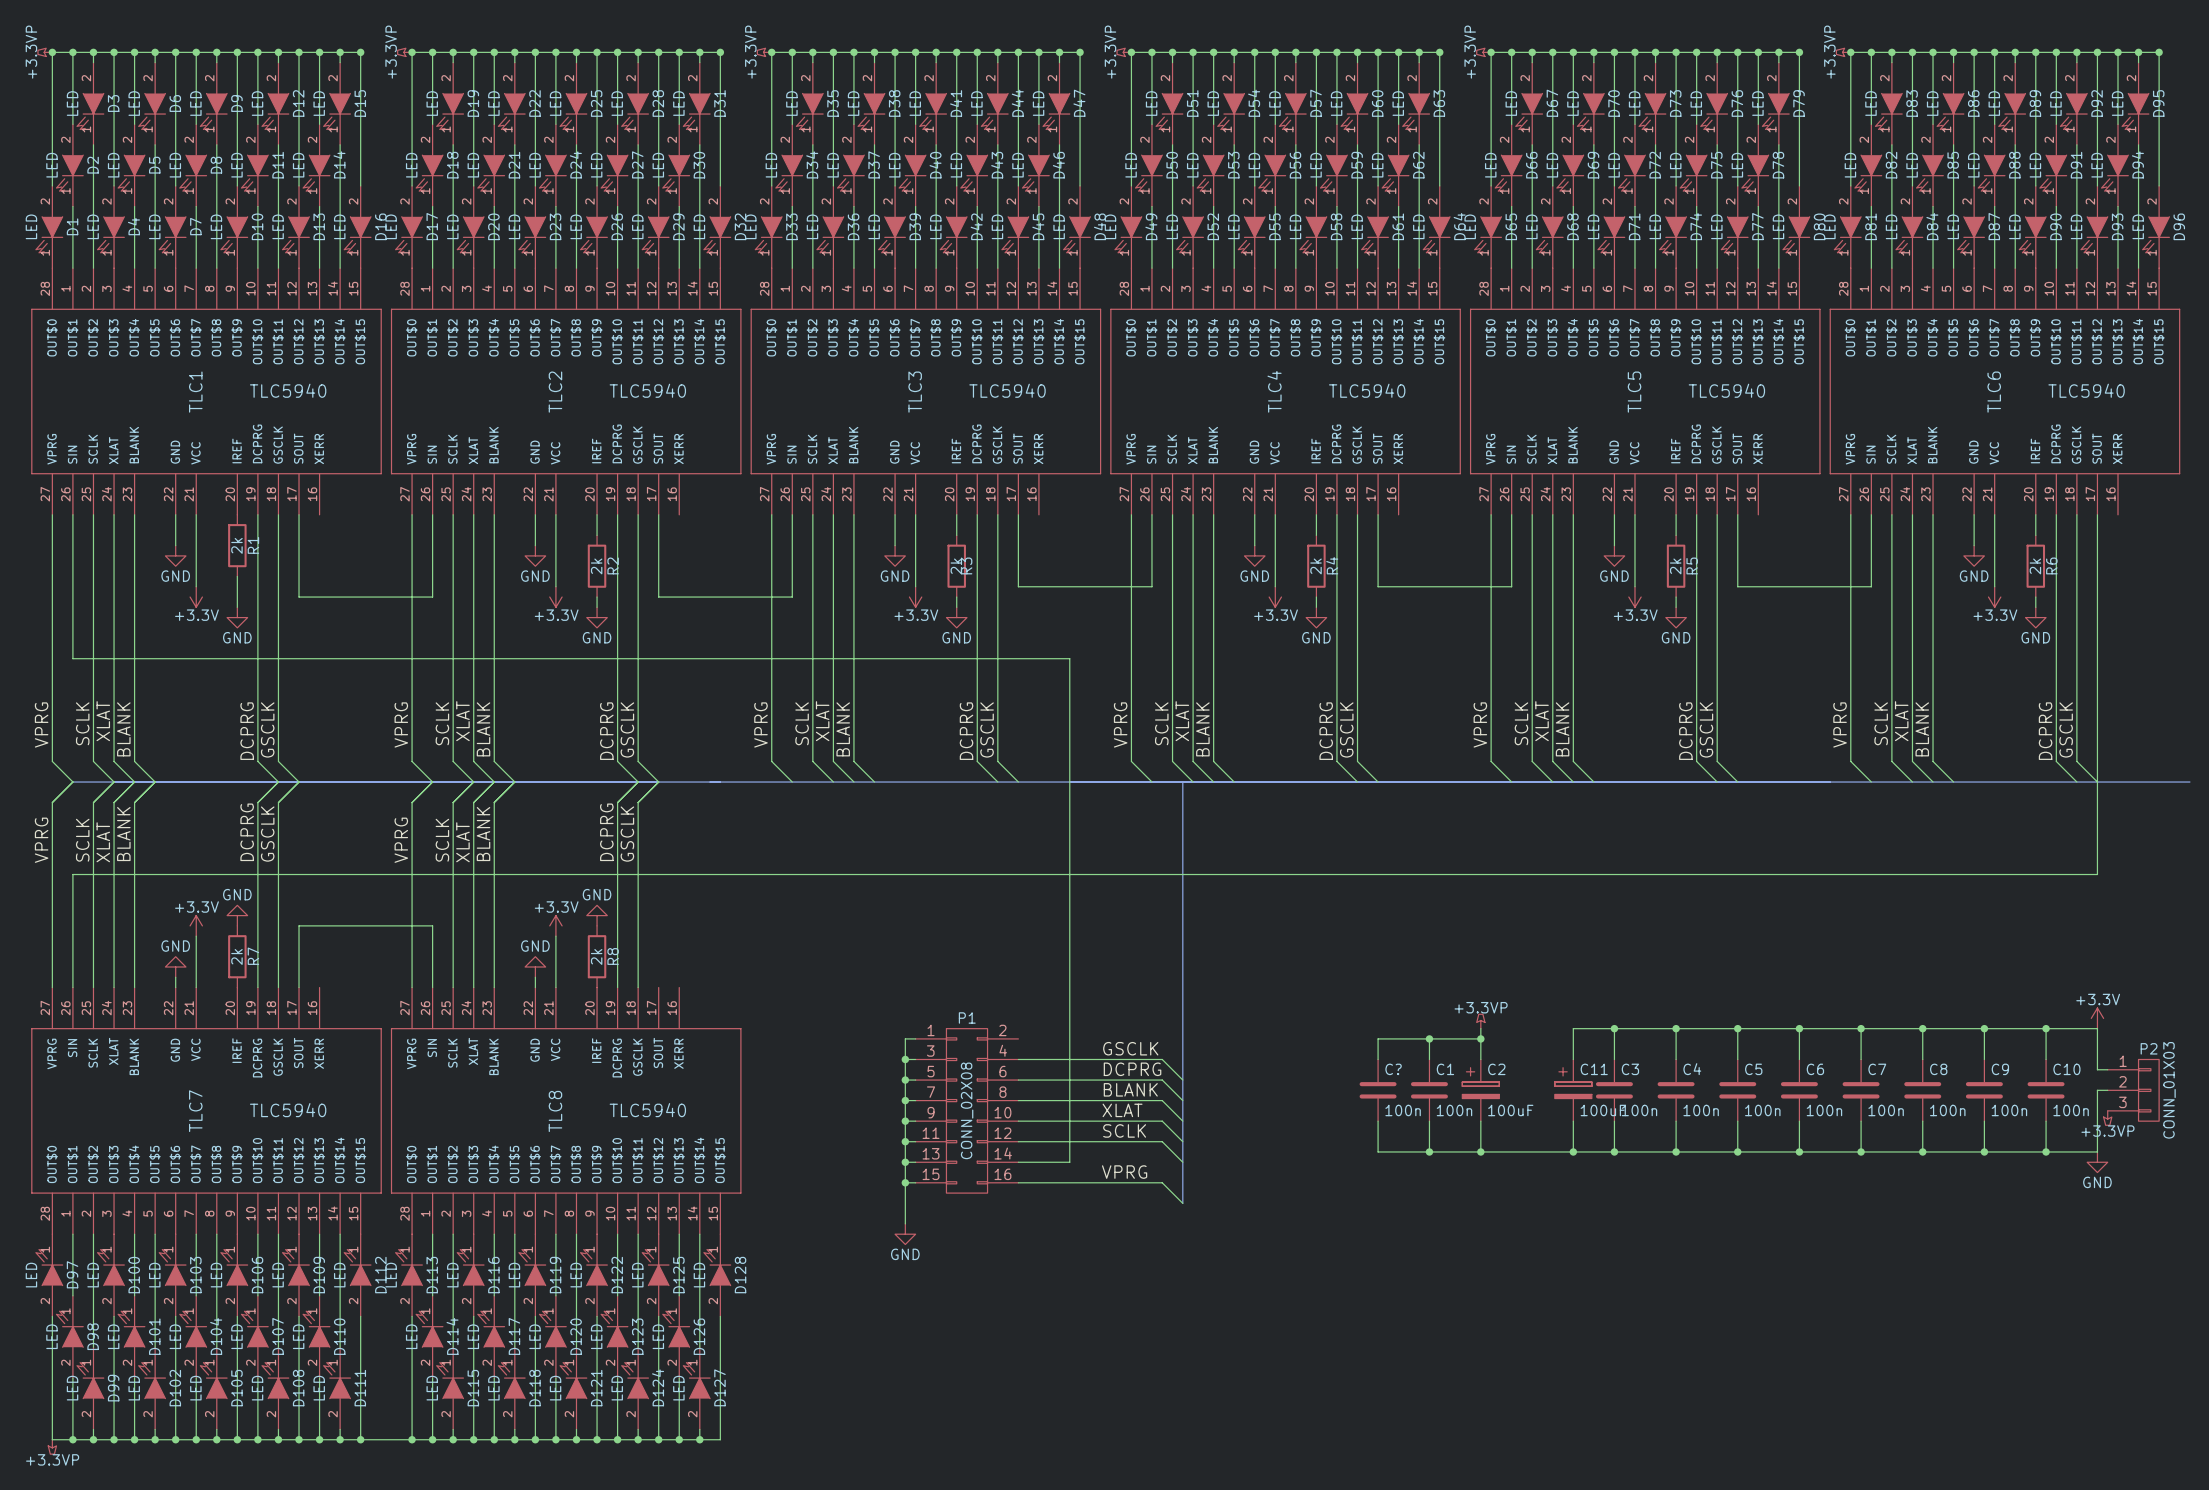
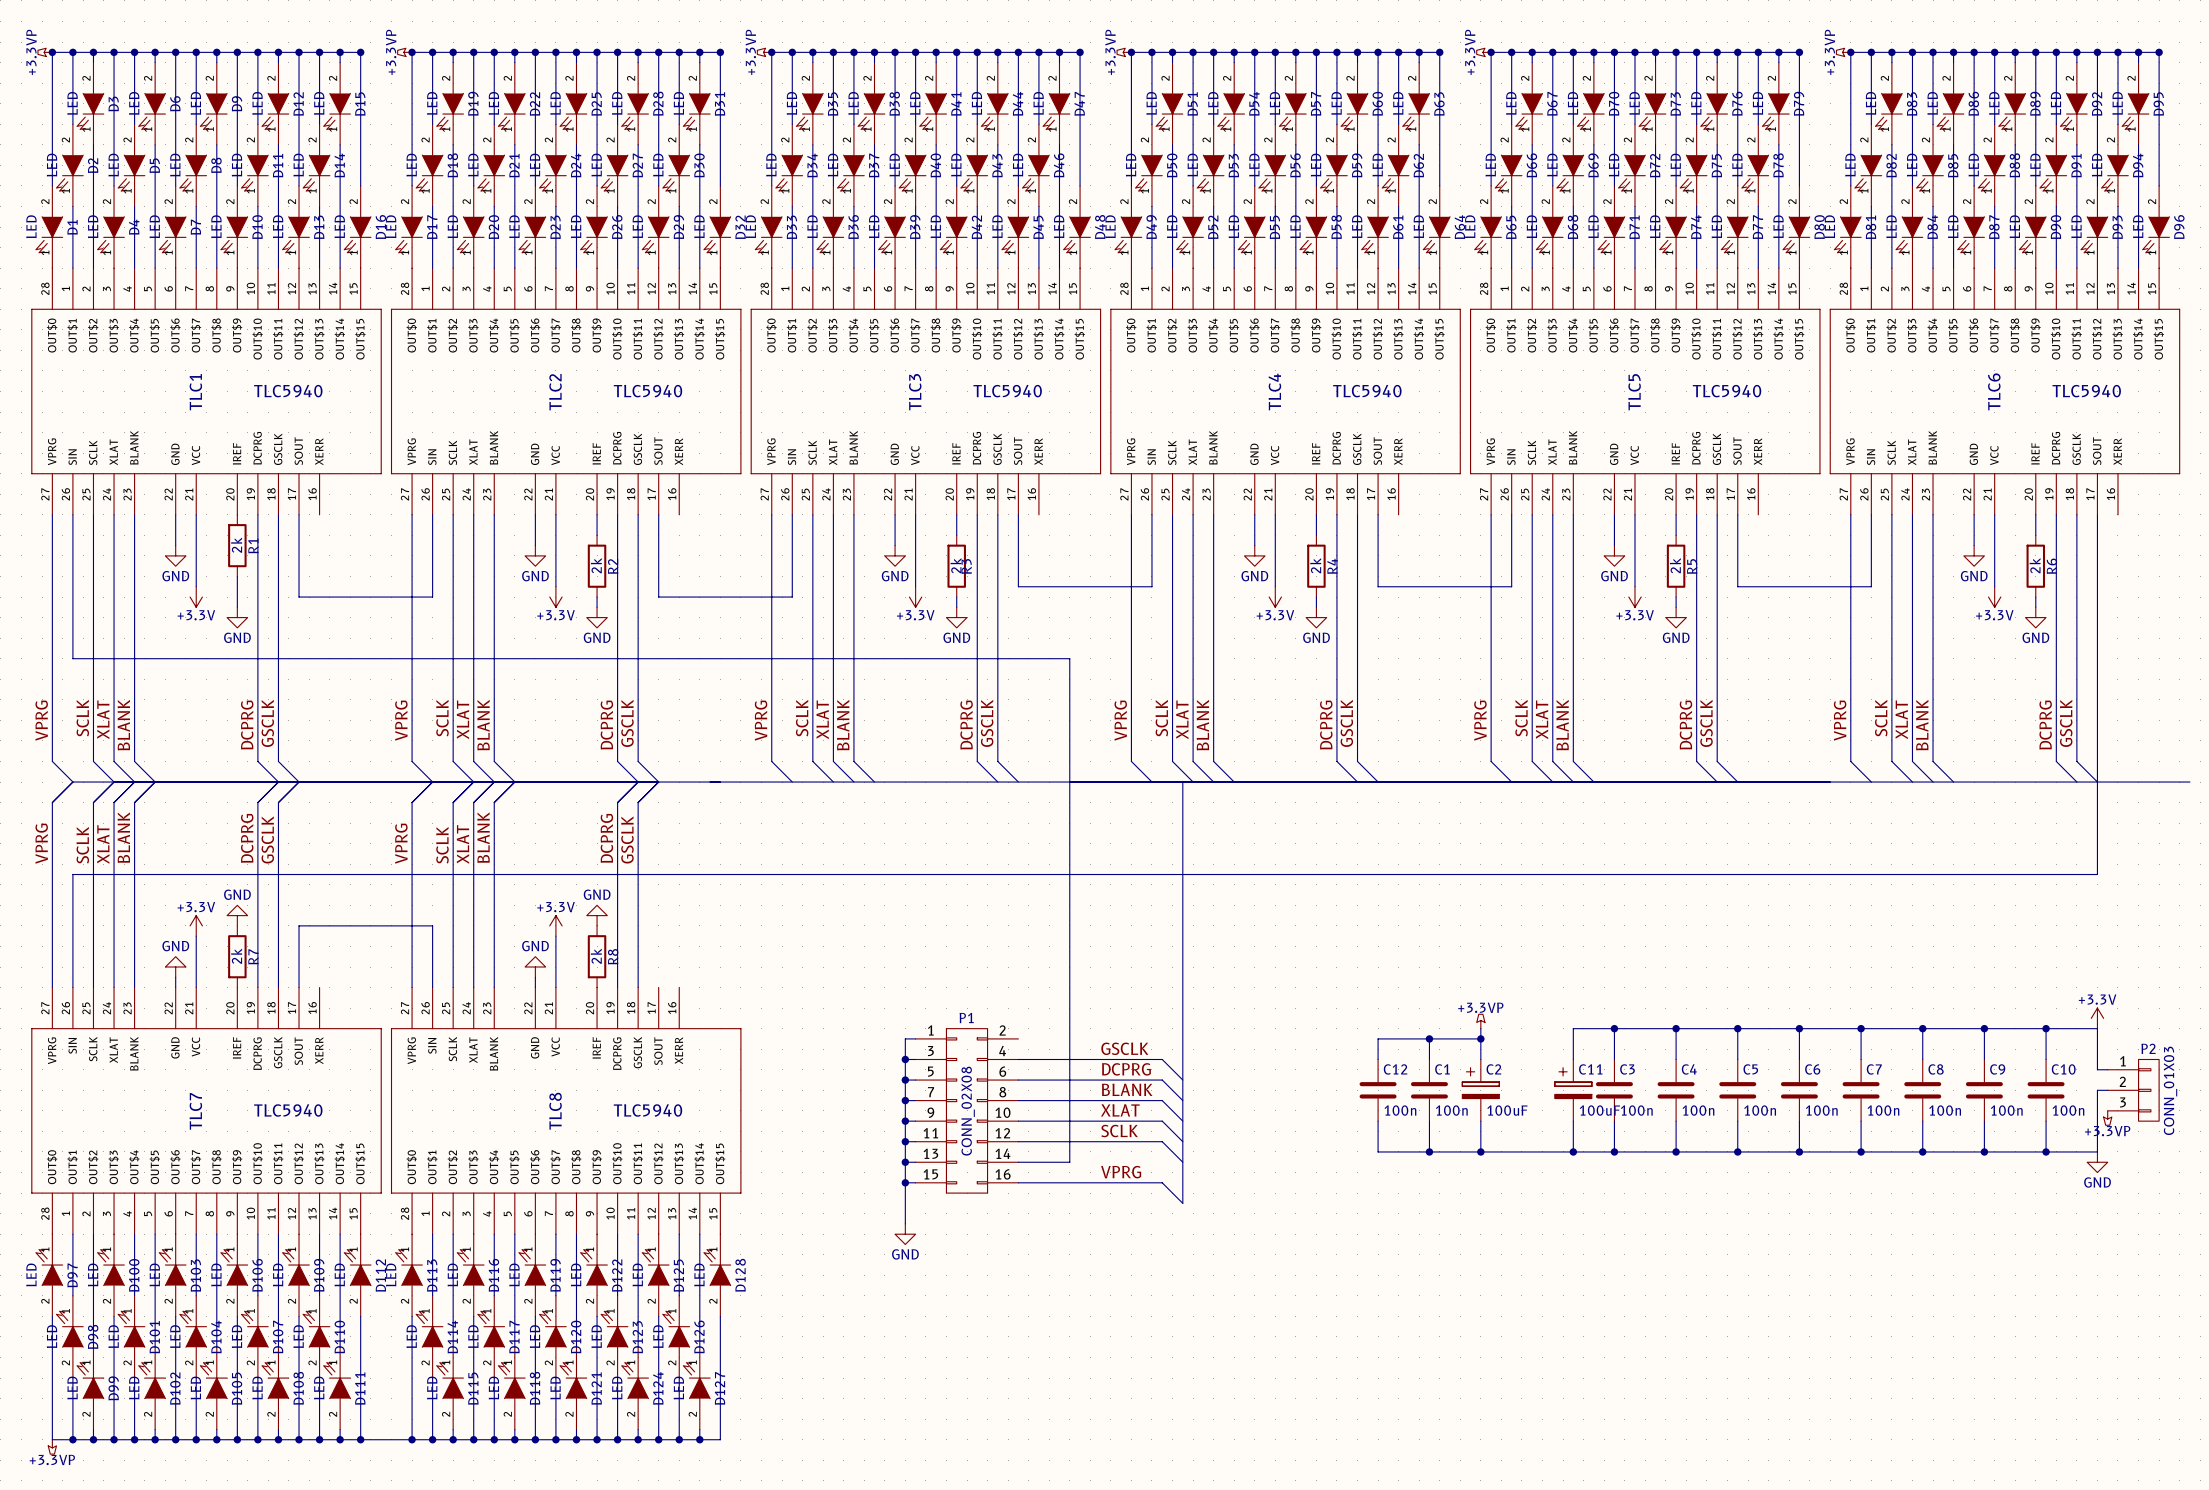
C? name: C? (1393, 1069) -> C12 (1395, 1069)

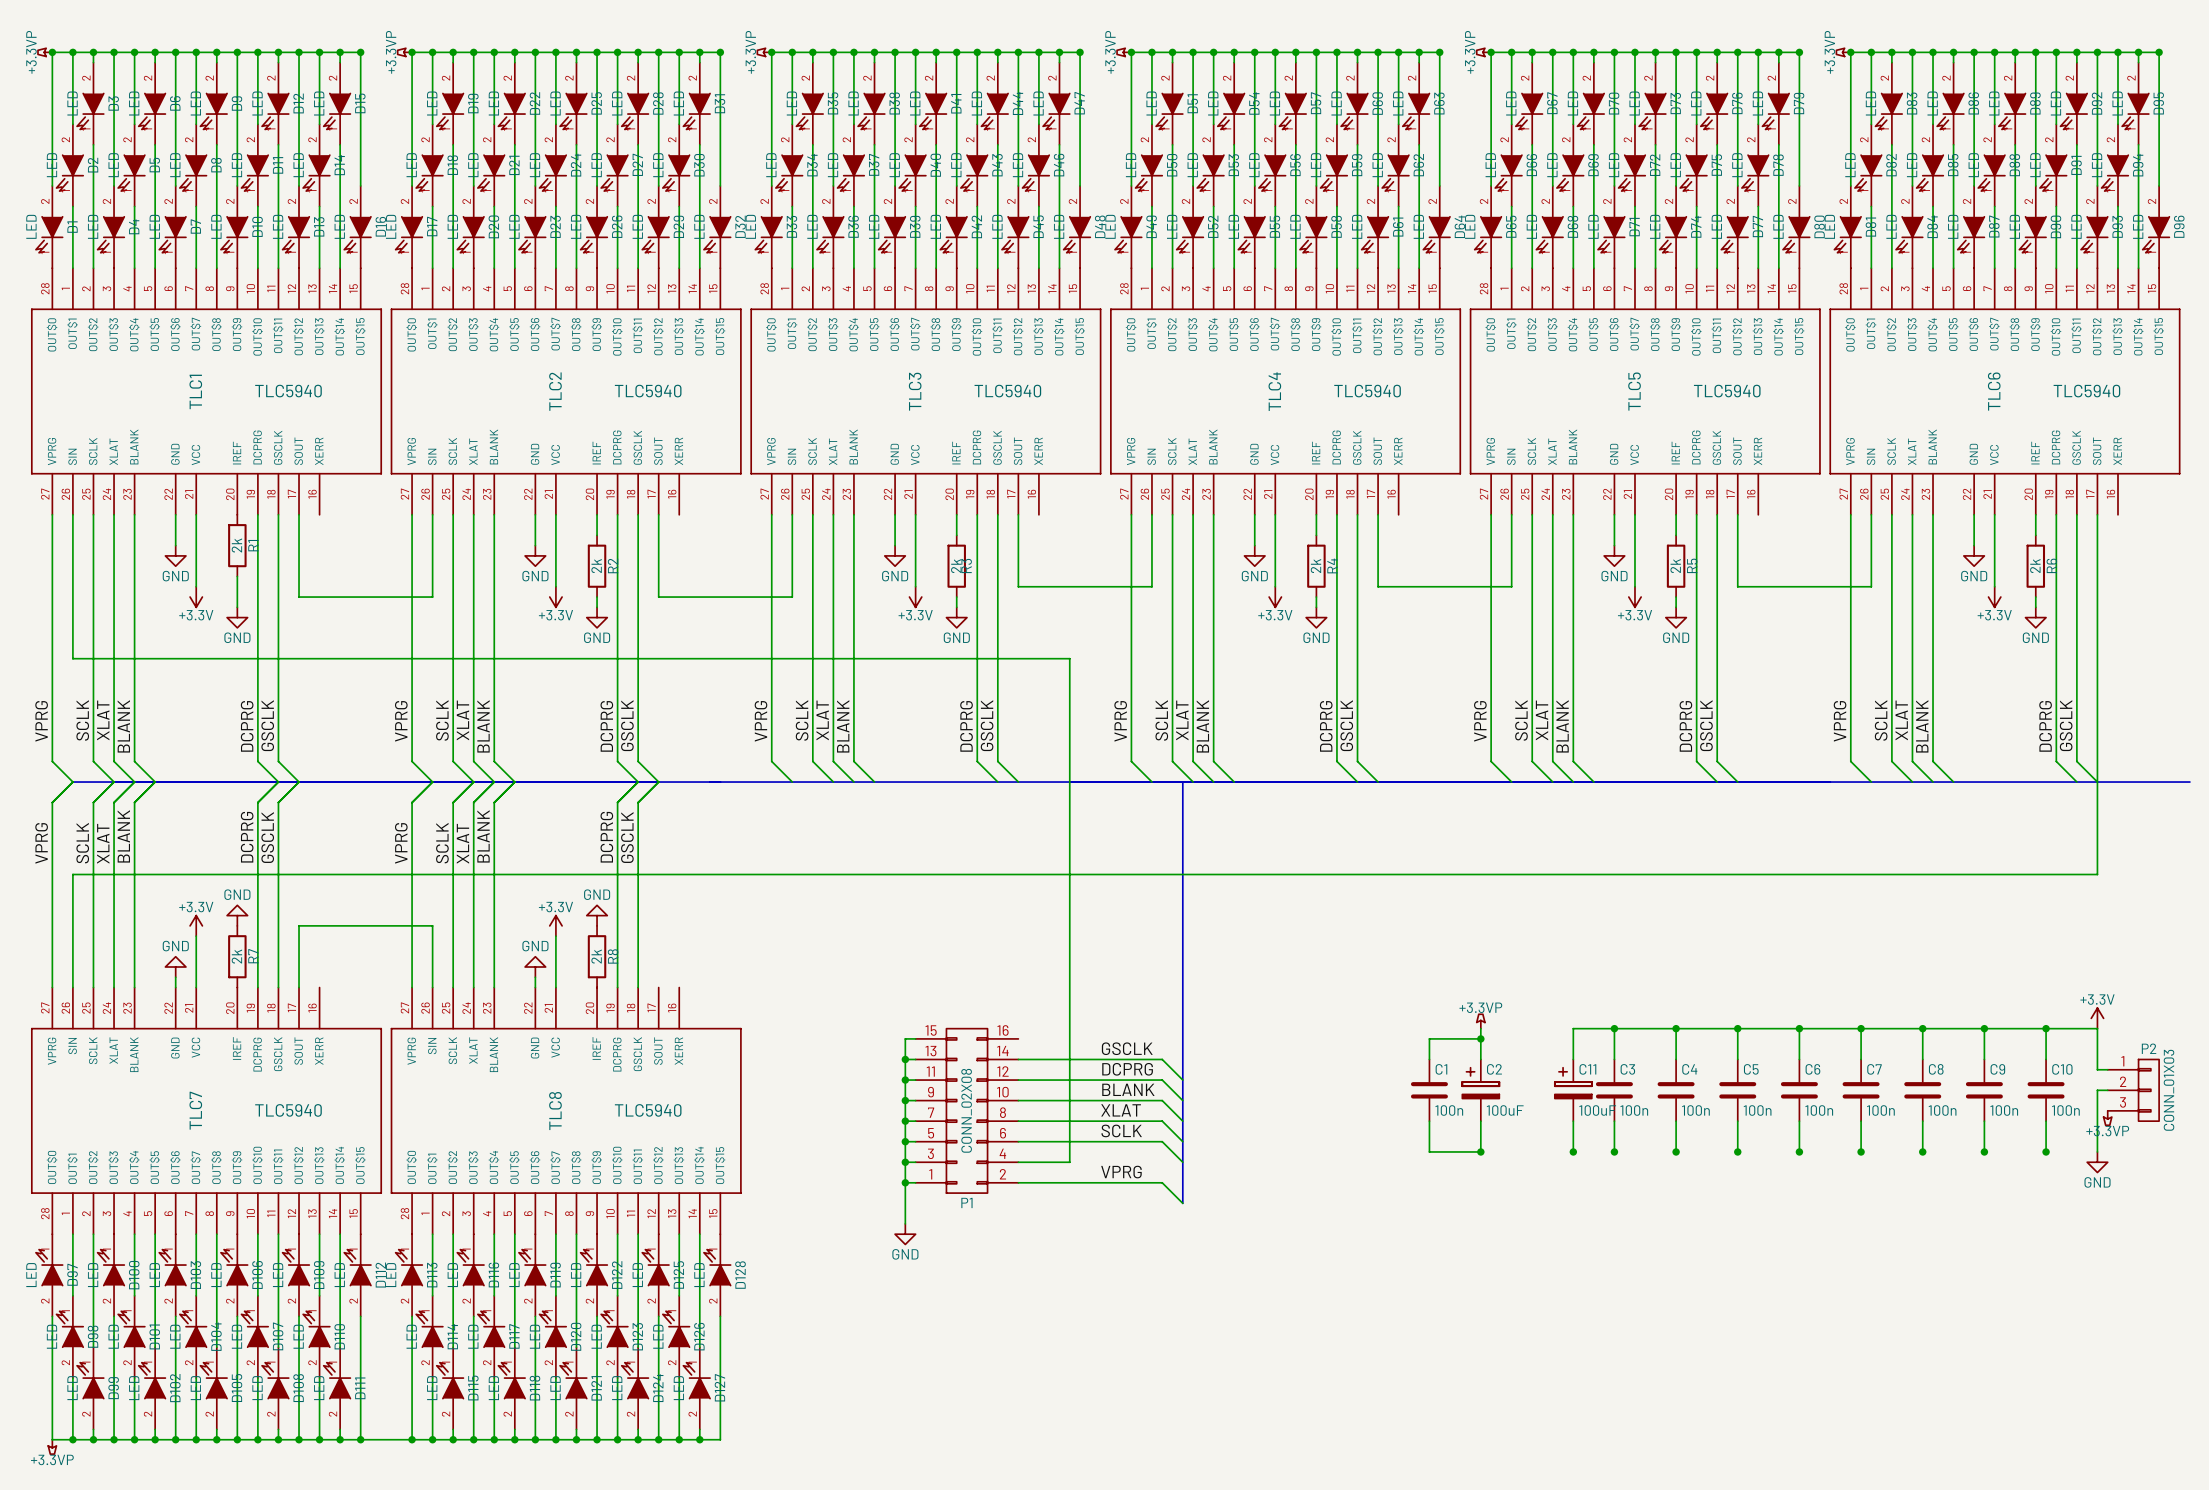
wire: (1429, 1038) (1378, 1038) (1378, 1059) -> none
junction: (1429, 1038) -> none
C12: 100n (1378, 1090) -> none
P1 flip: as is (967, 1110) -> up-down (967, 1110)
wire: (1378, 1121) (1378, 1151) (1429, 1151) -> none
junction: (1429, 1151) -> none
wire: (1480, 1151) (2097, 1151) -> none

